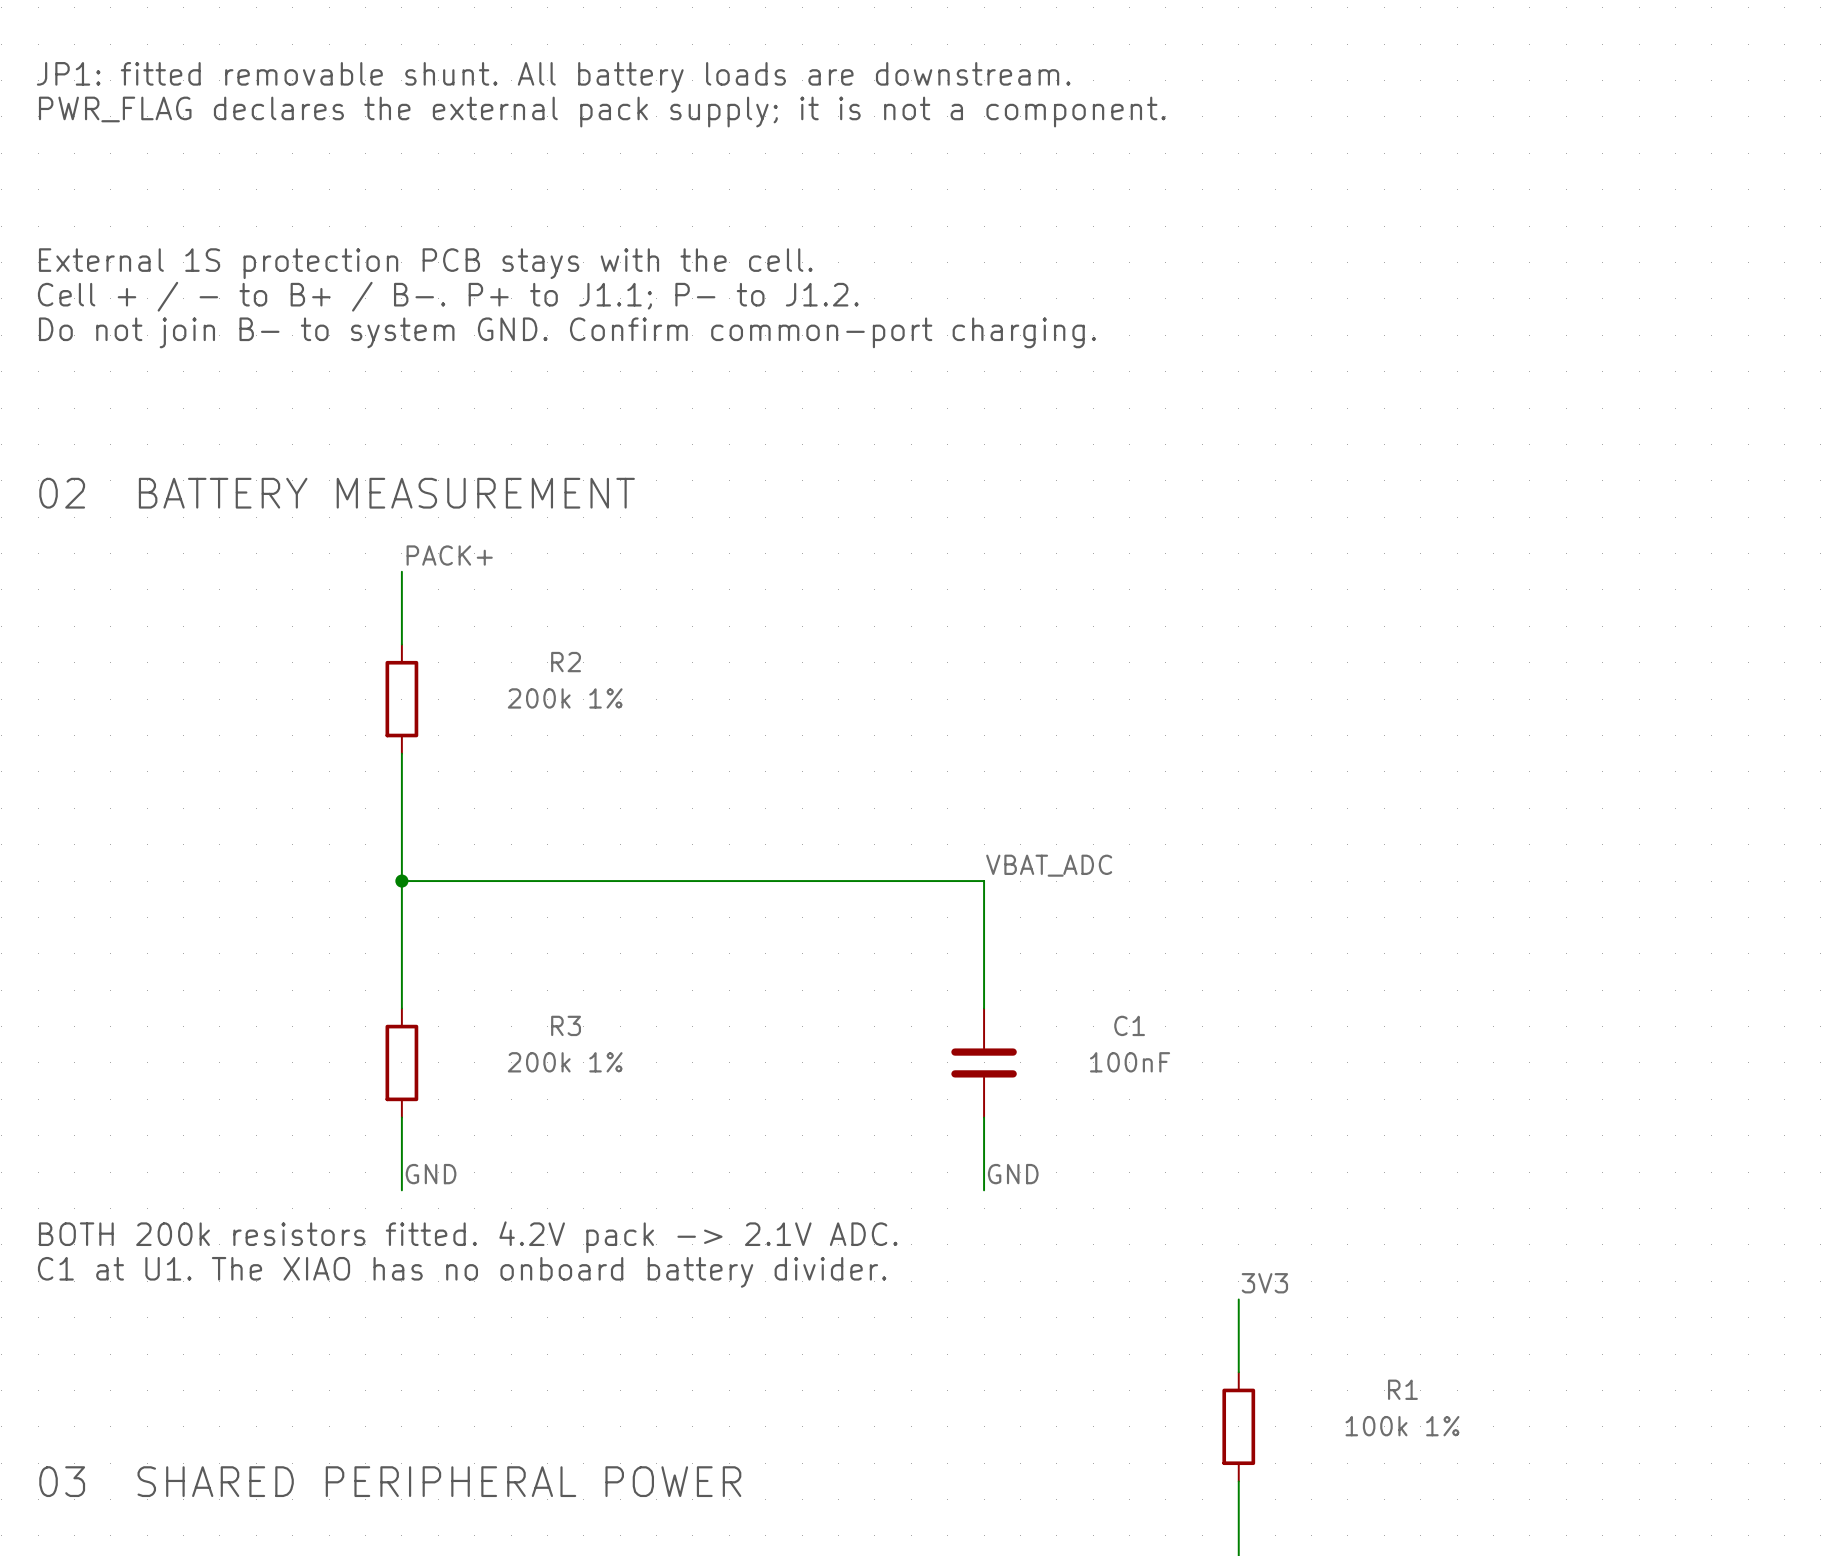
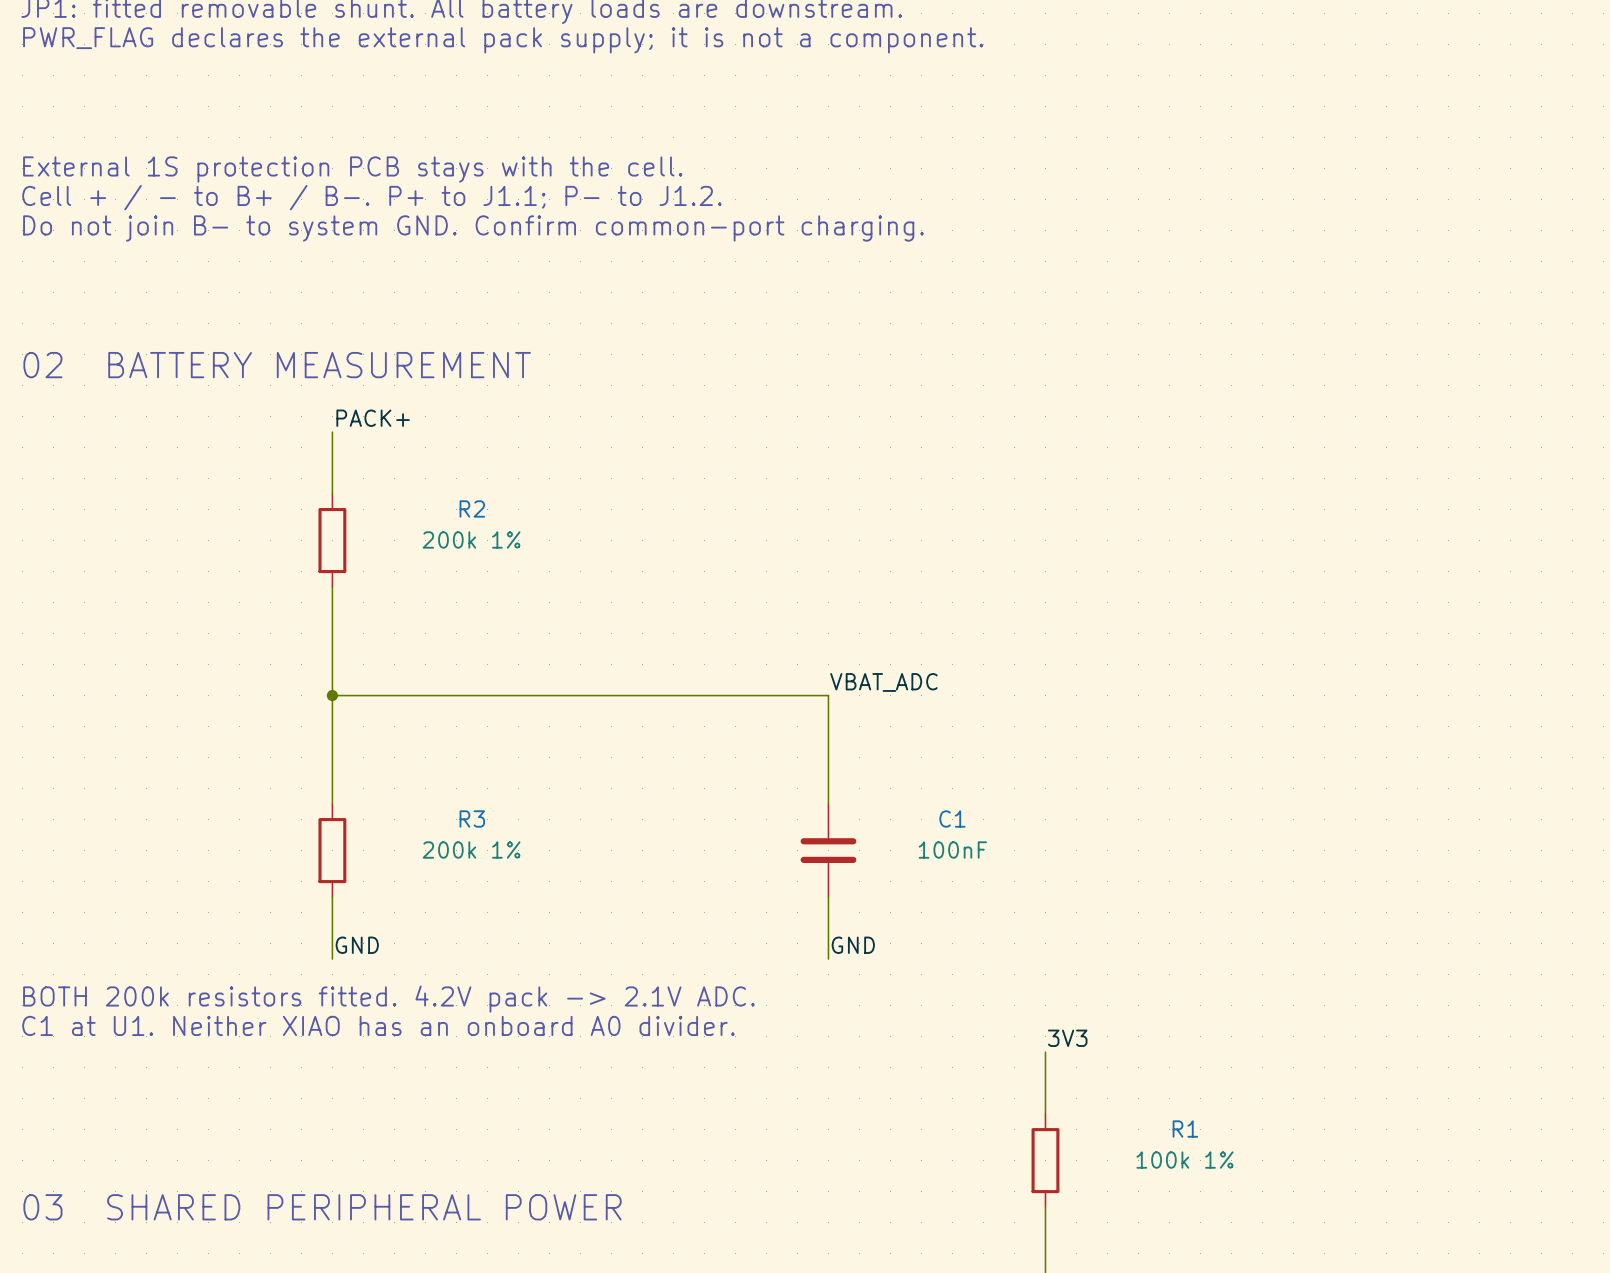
text: C1 at U1. The XIAO has no onboard battery divider. (462, 1272) -> C1 at U1. Neither XIAO has an onboard A0 divider. (378, 1025)

